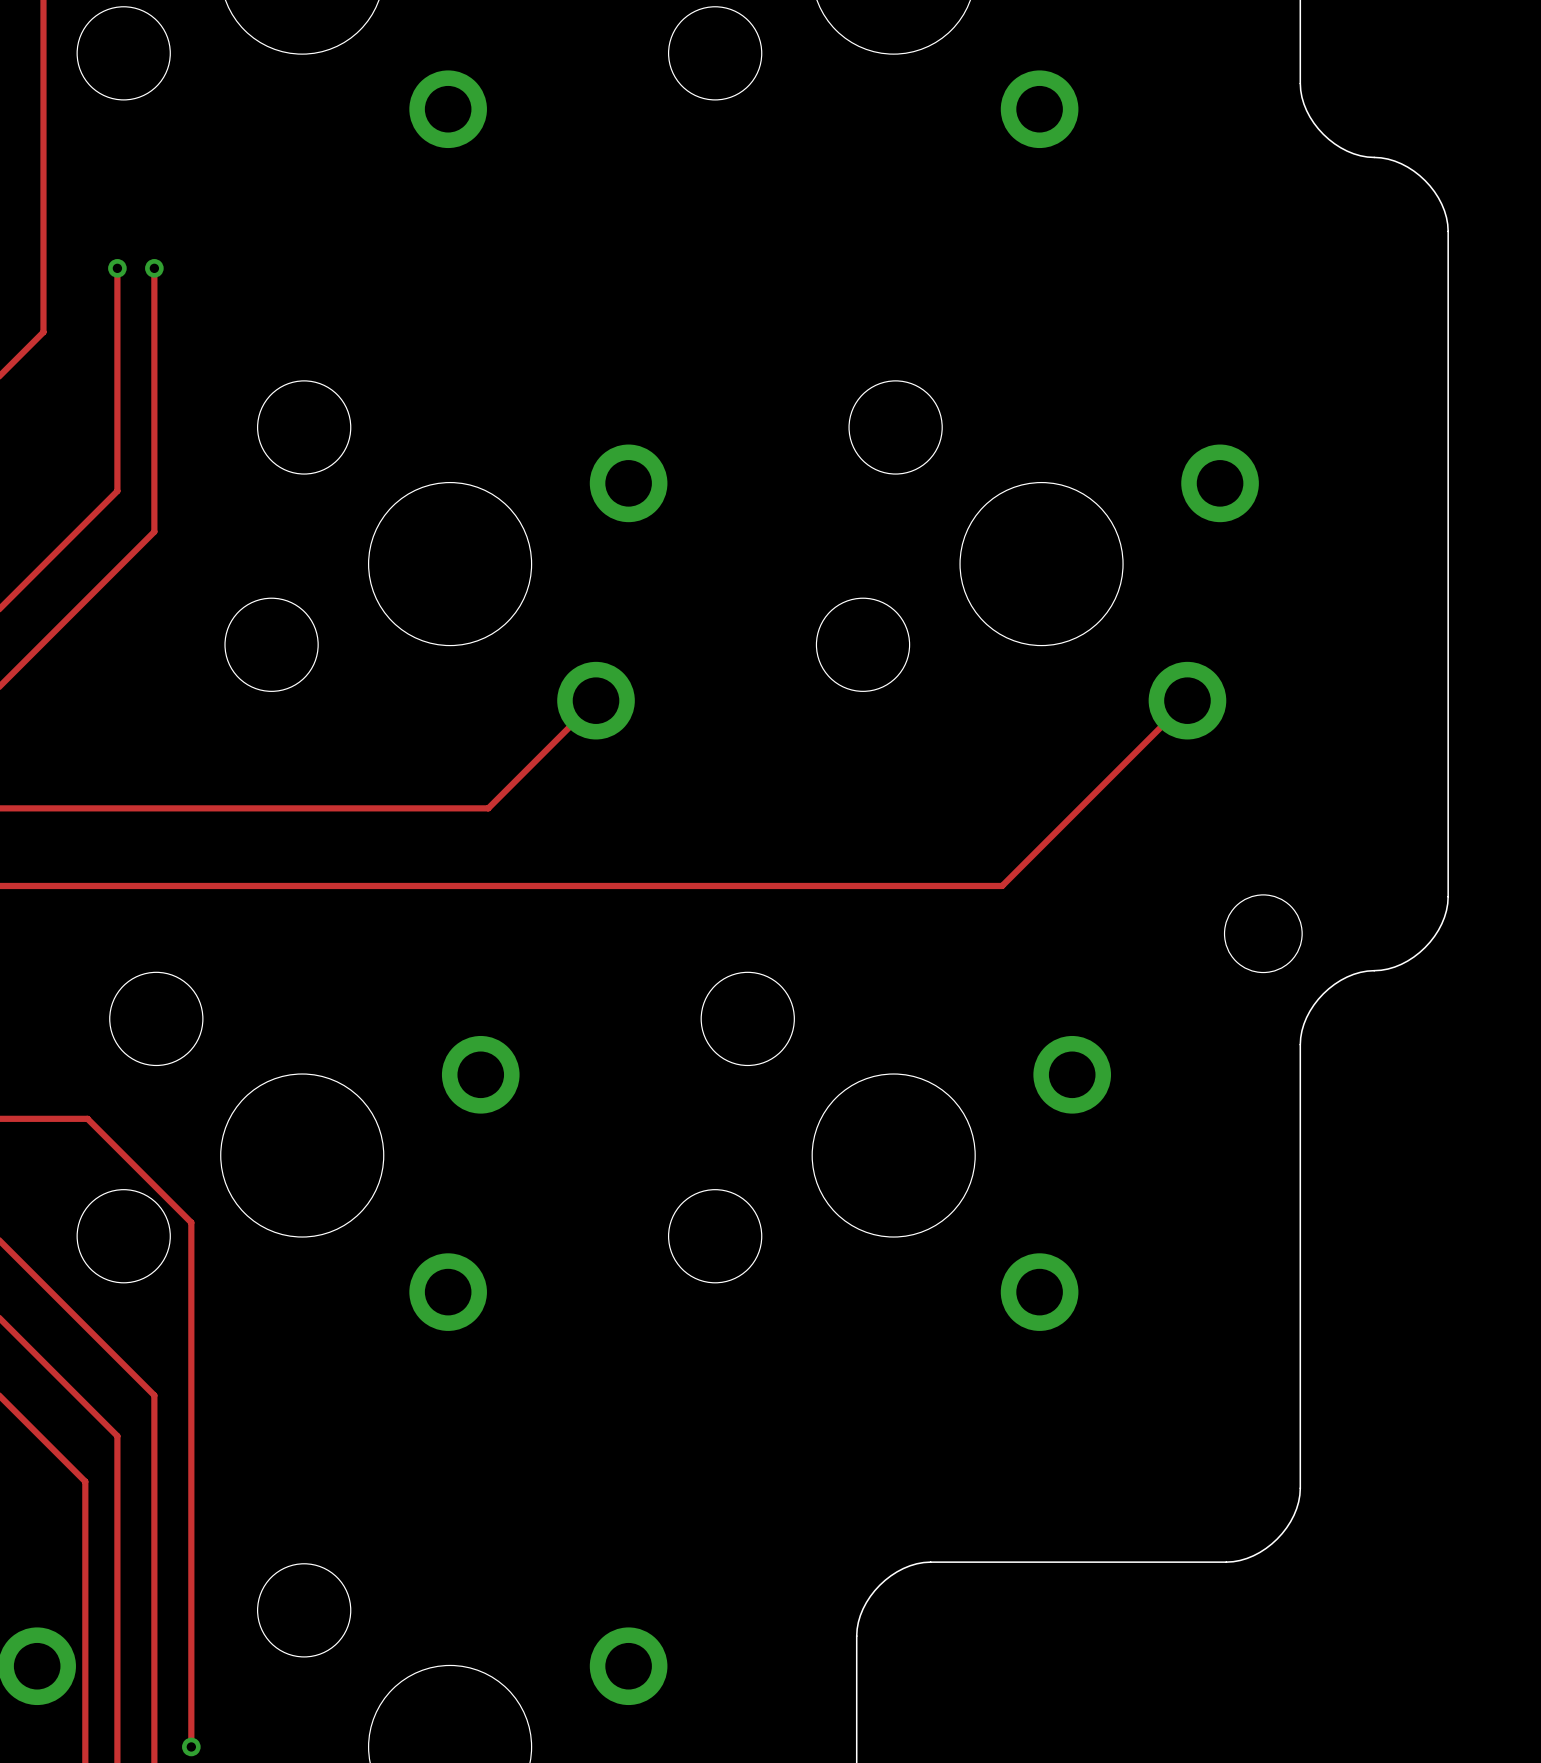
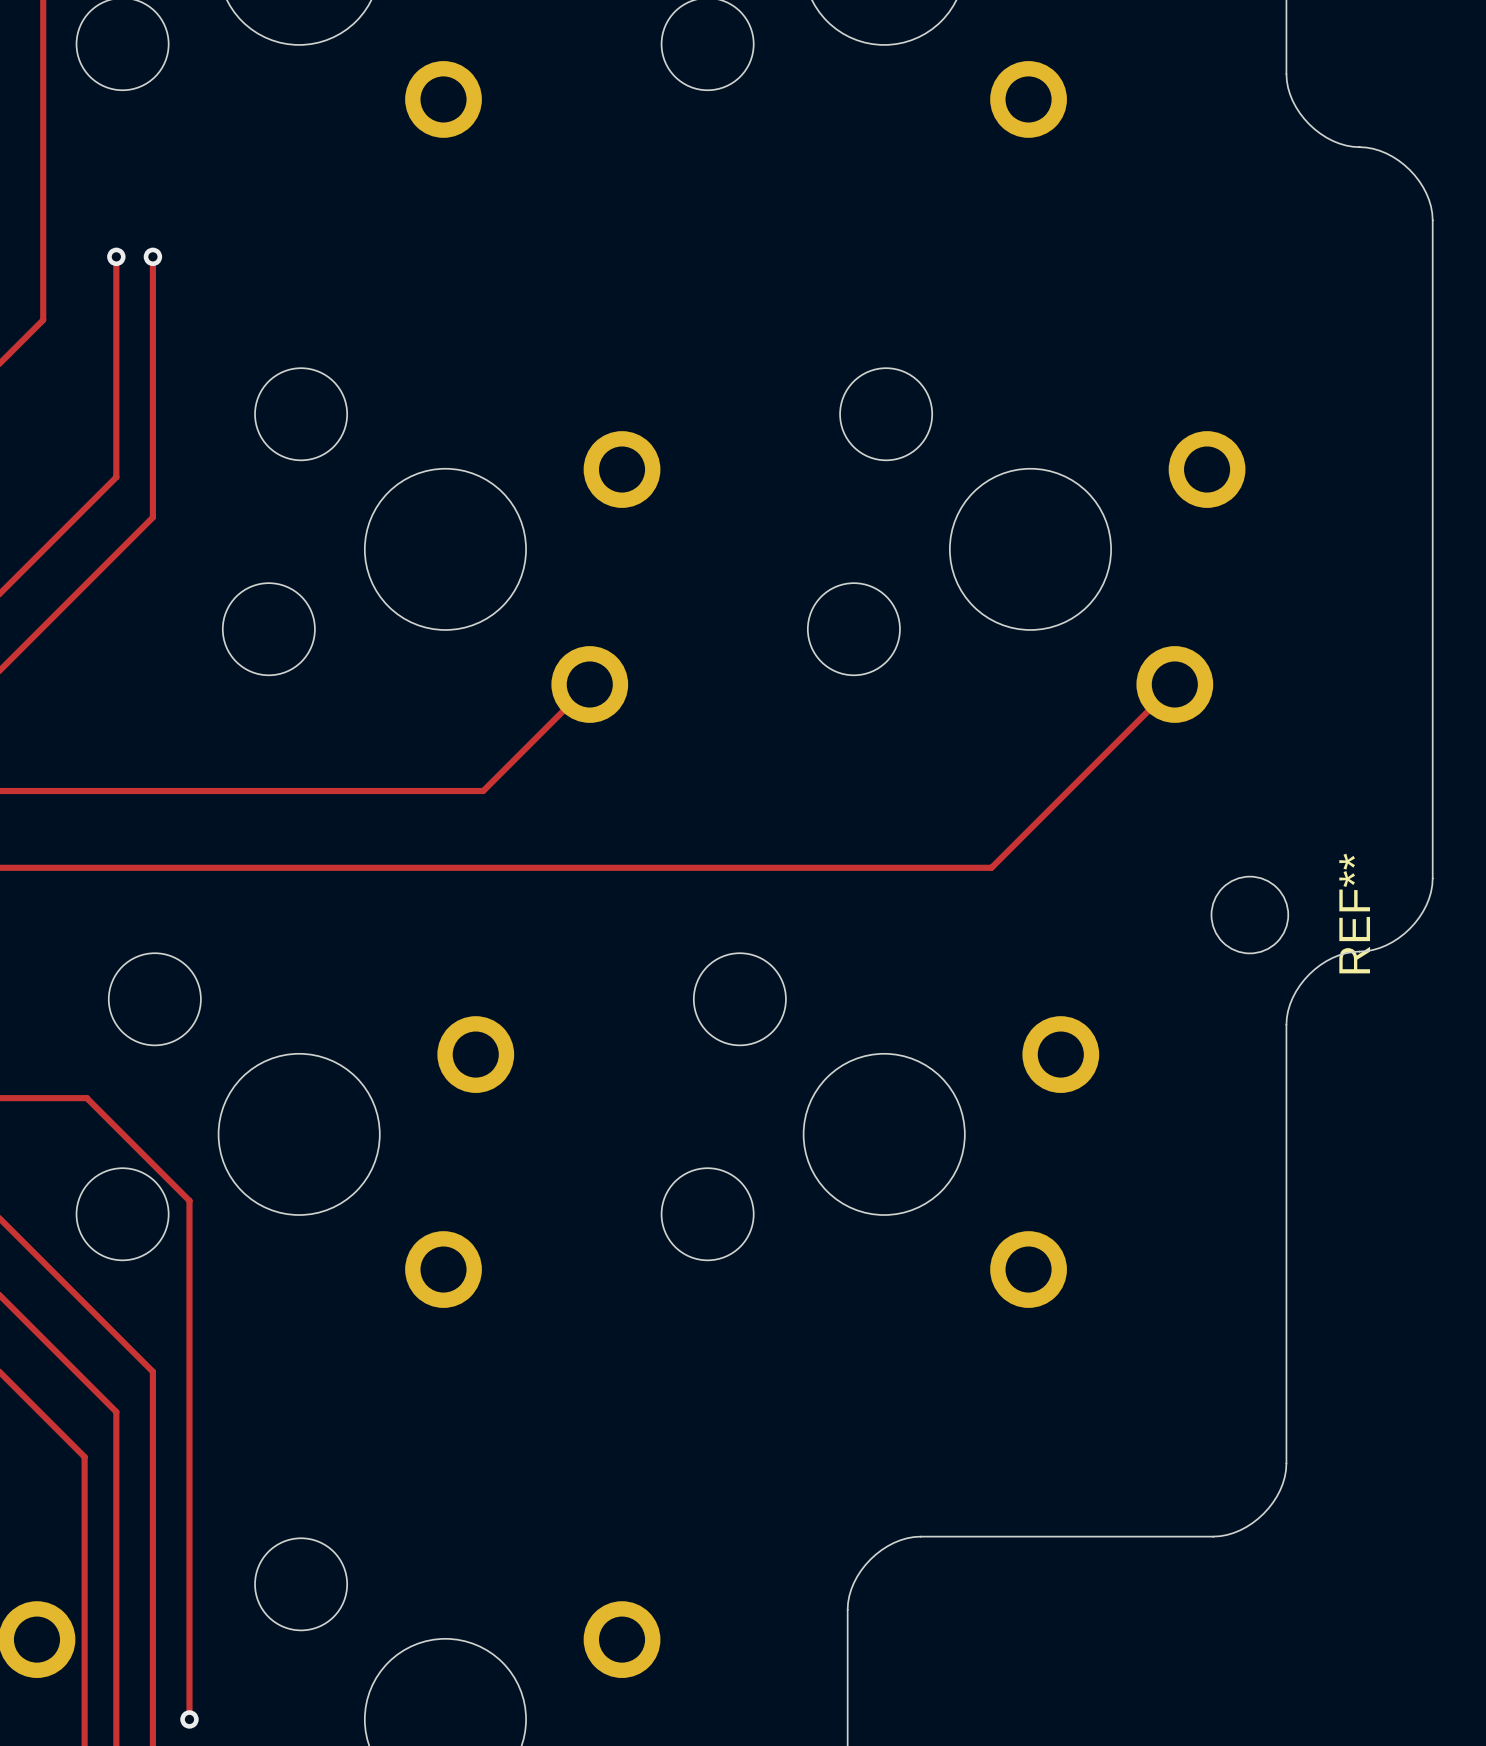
REF** name: none -> REF** (1354, 913)

